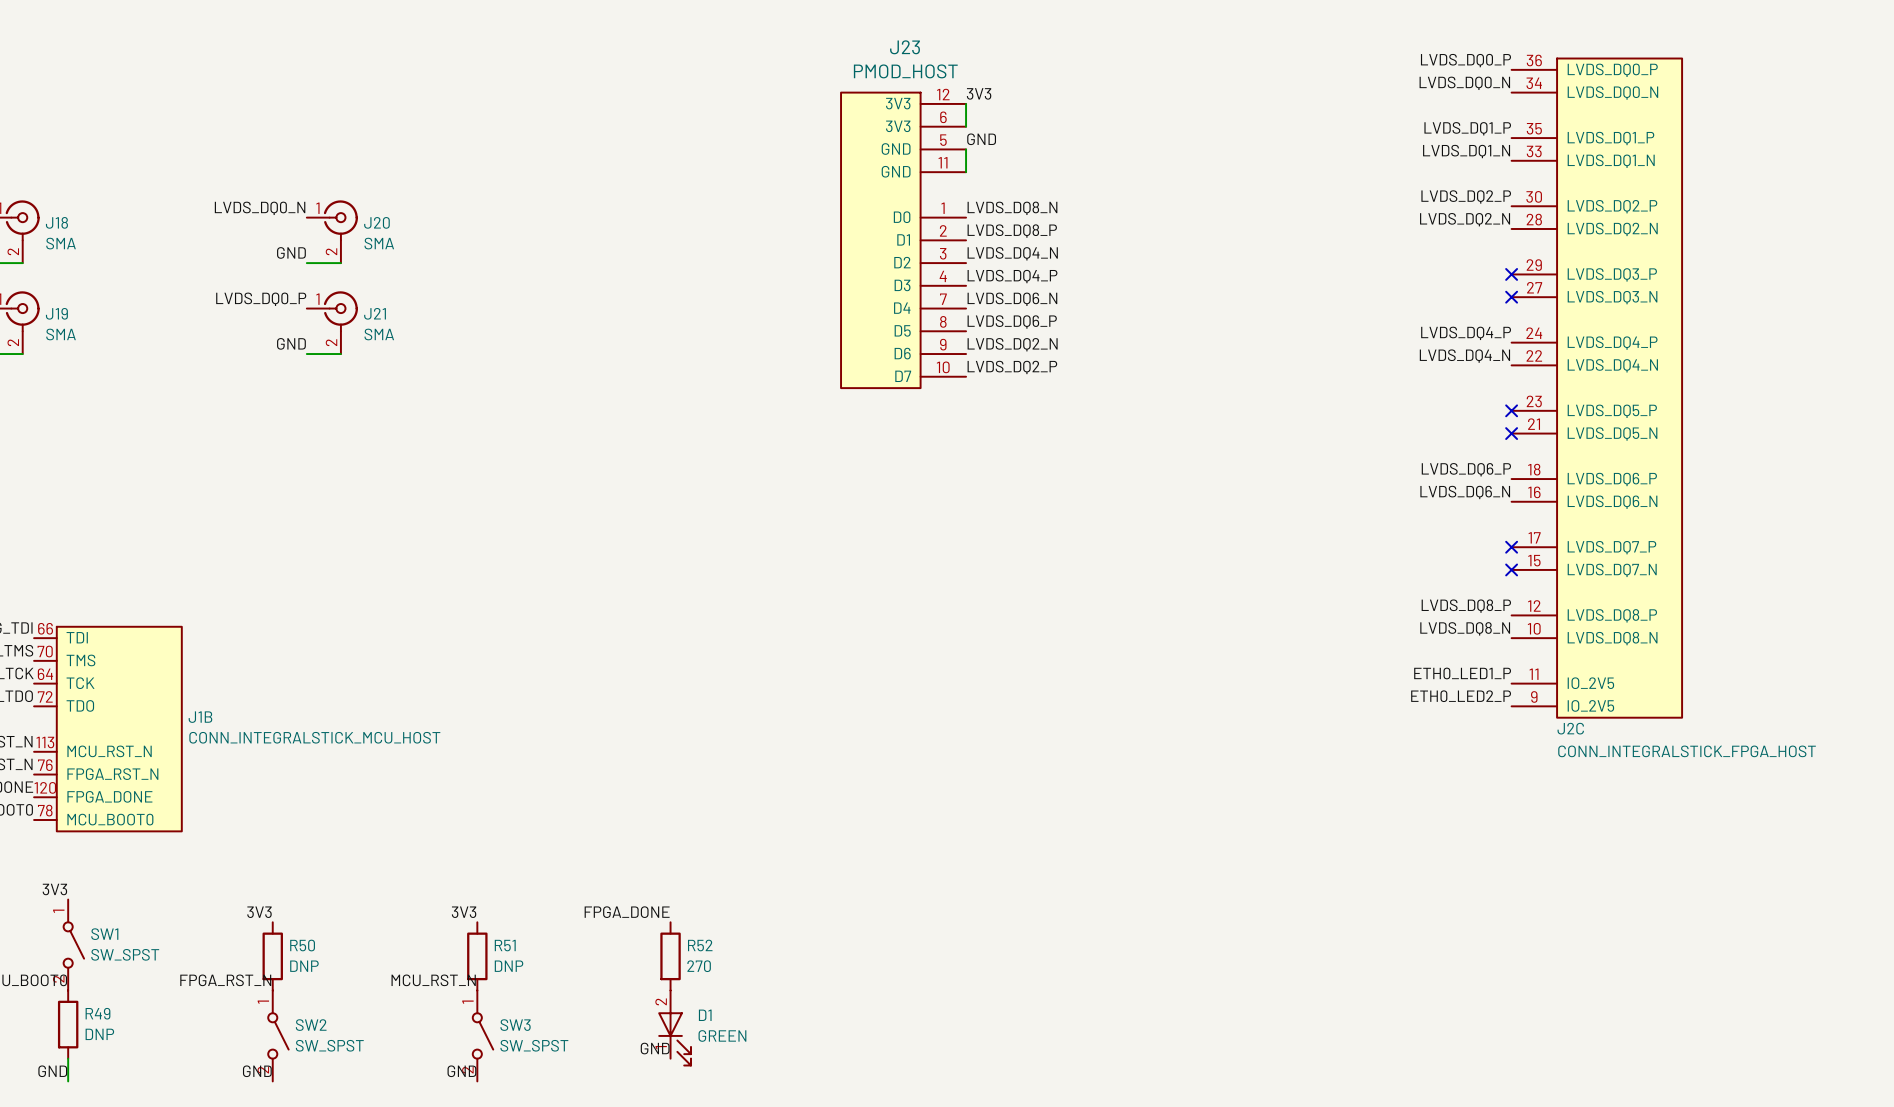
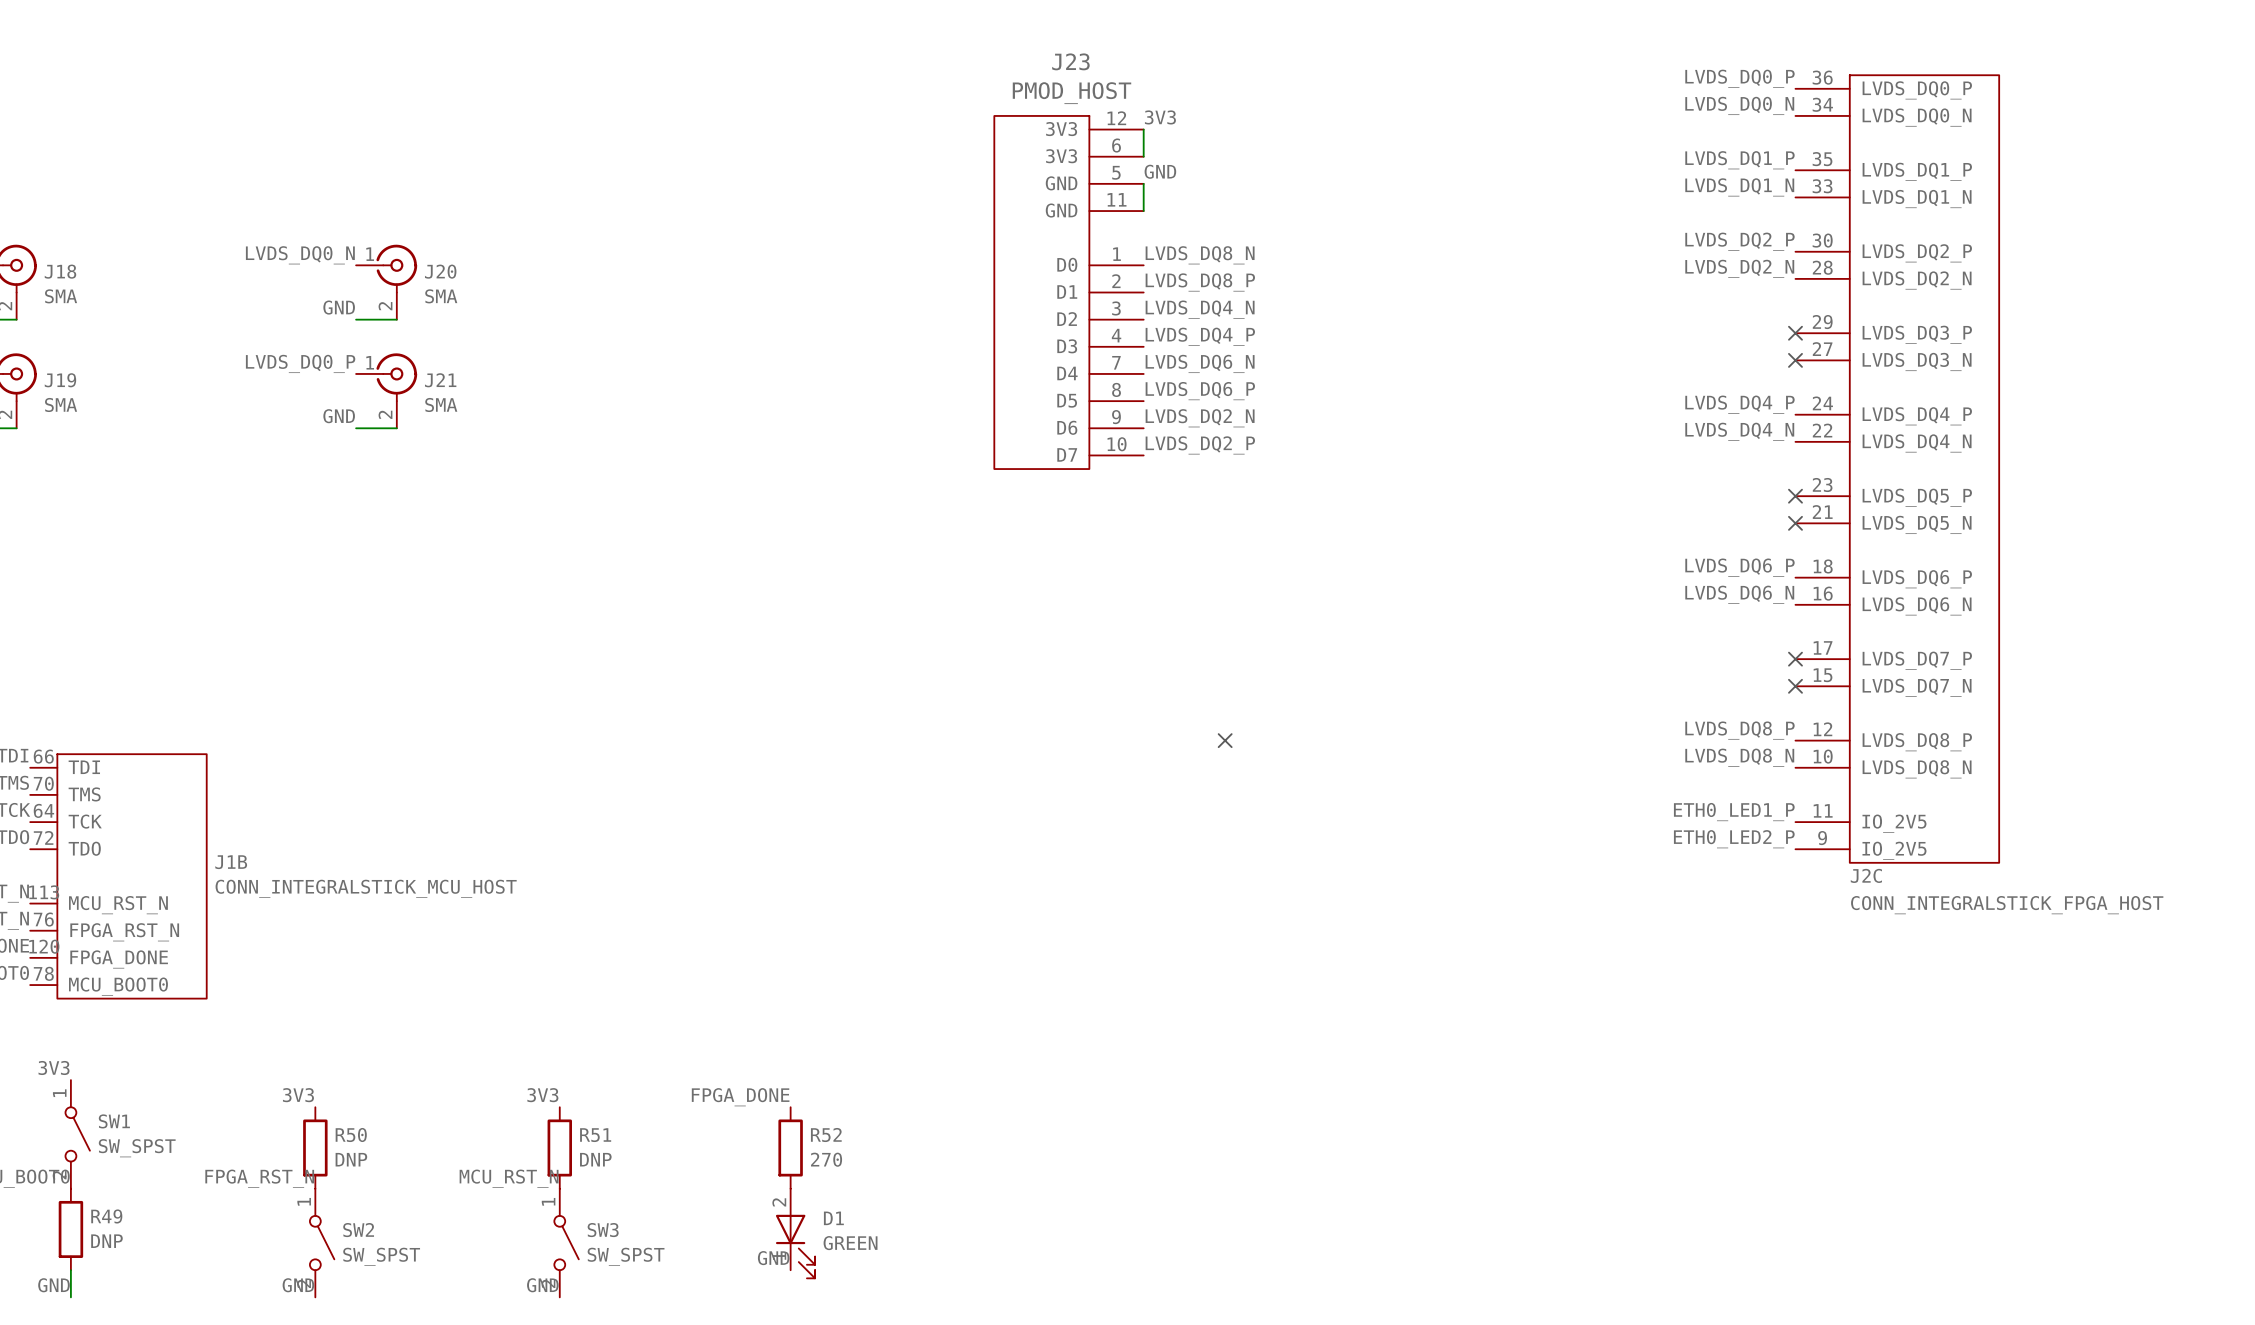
no-connect mark: none -> (1225, 740)

